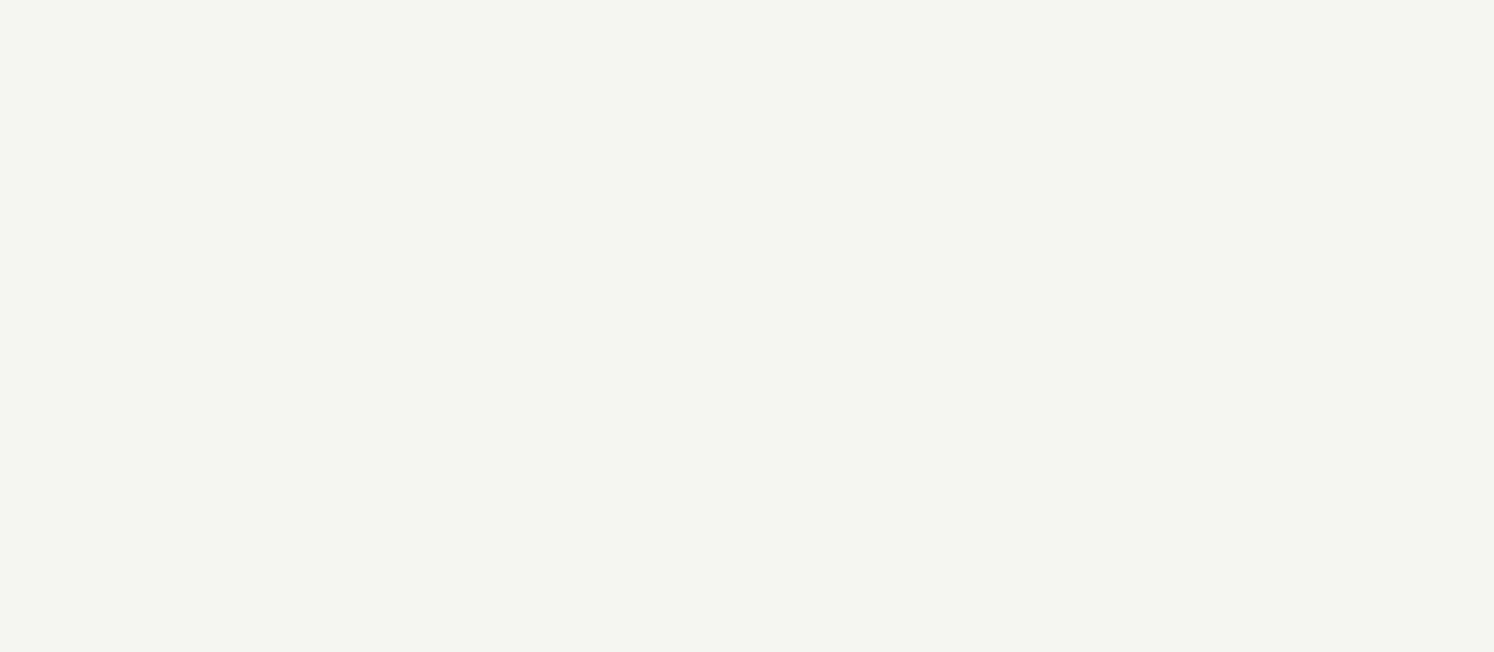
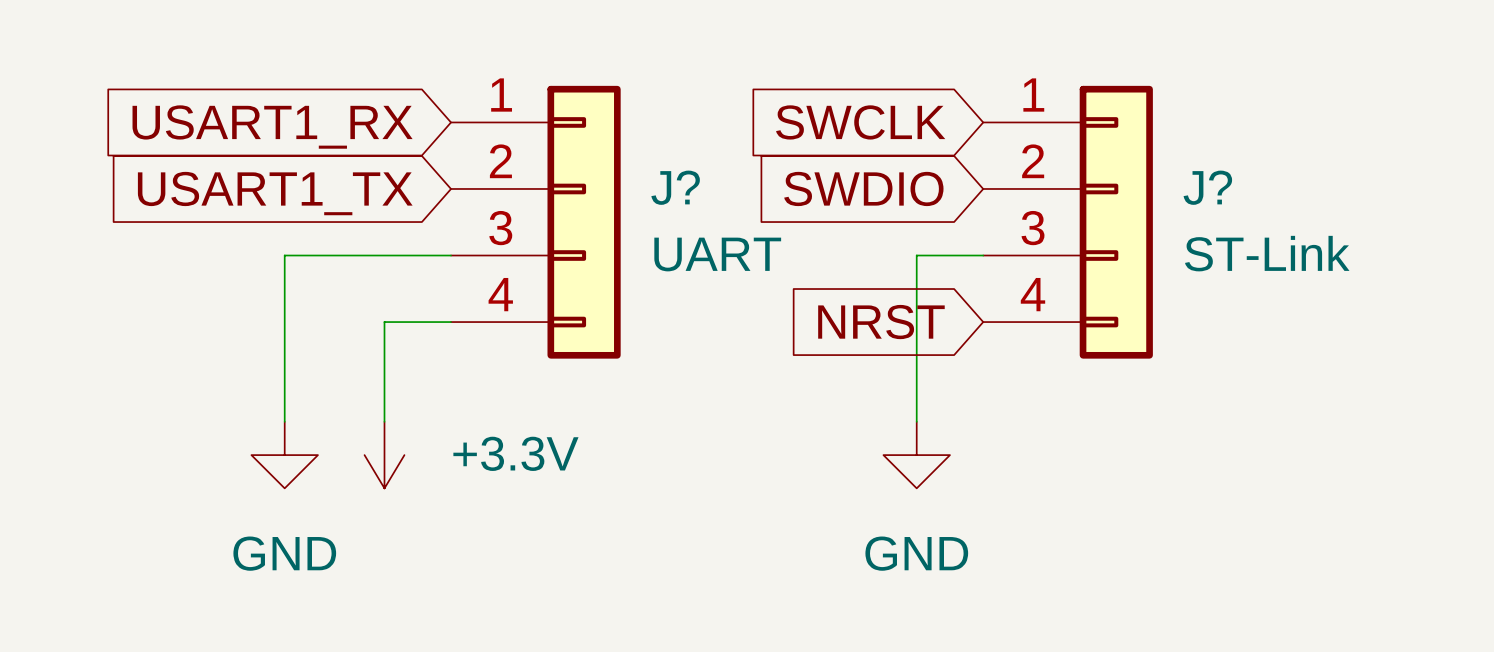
global label: none -> SWCLK (860, 122)
global label: none -> USART1_RX (272, 127)
global label: none -> SWDIO (863, 188)
global label: none -> USART1_TX (275, 193)
J?: none -> UART (535, 222)
J?: none -> ST-Link (1068, 222)
wire: none -> (451, 255) (284, 255) (284, 421)
wire: none -> (983, 255) (916, 255) (916, 421)
wire: none -> (451, 322) (384, 322) (384, 421)
global label: none -> NRST (881, 322)
power symbol: none -> GND (284, 455)
power symbol: none -> +3.3V (384, 455)
power symbol: none -> GND (916, 455)

